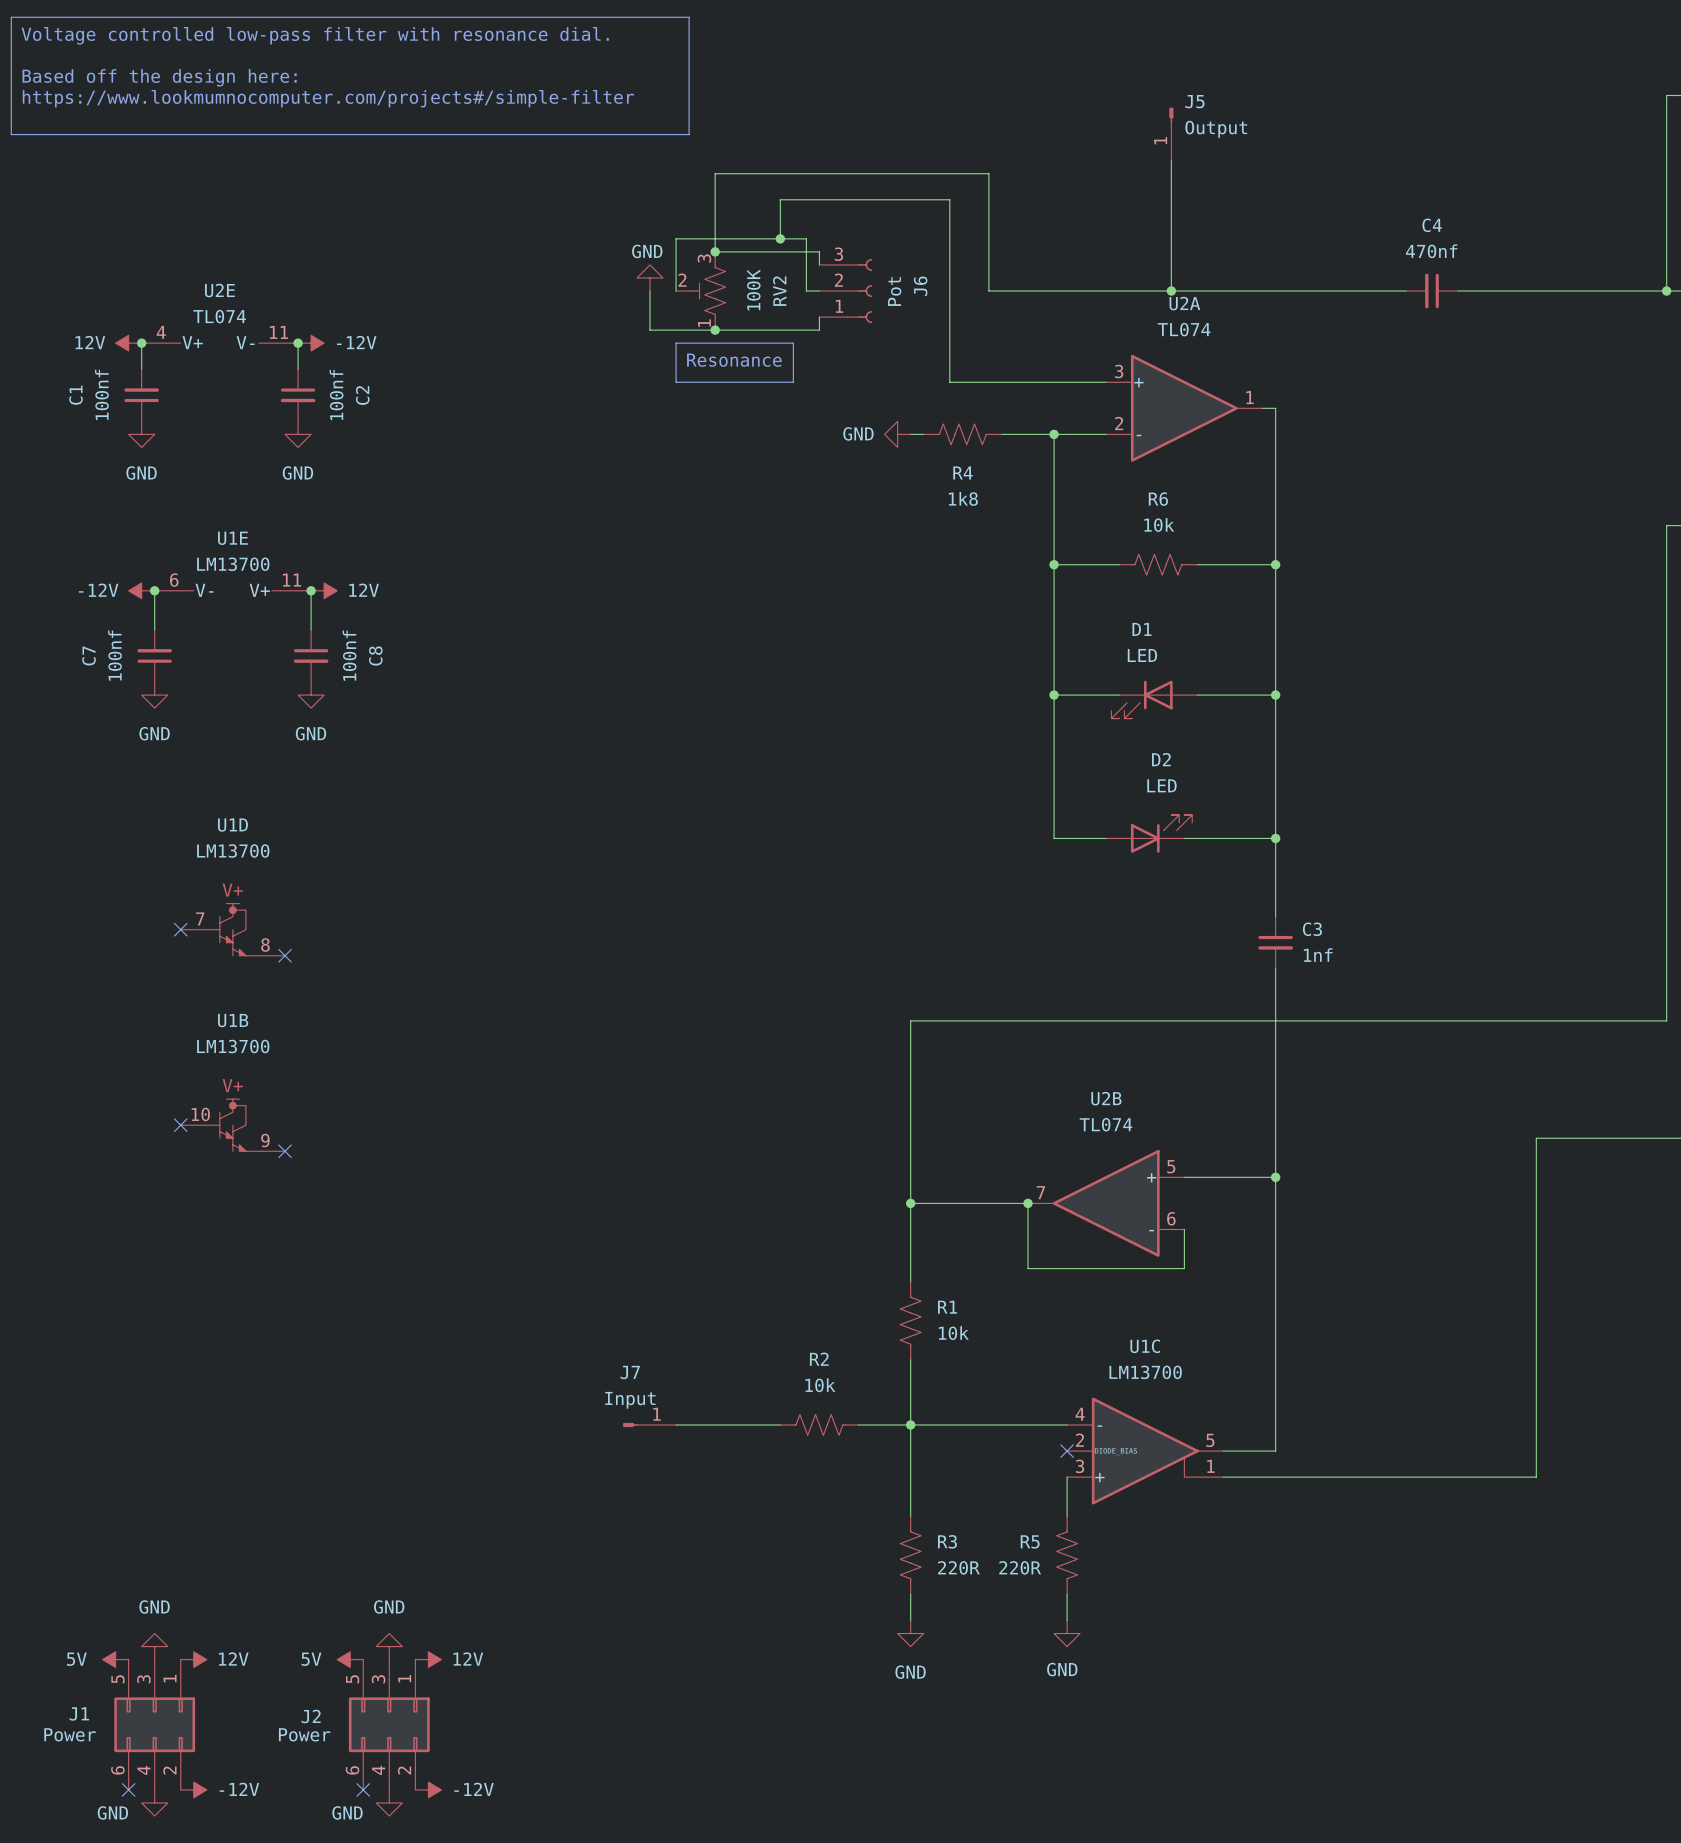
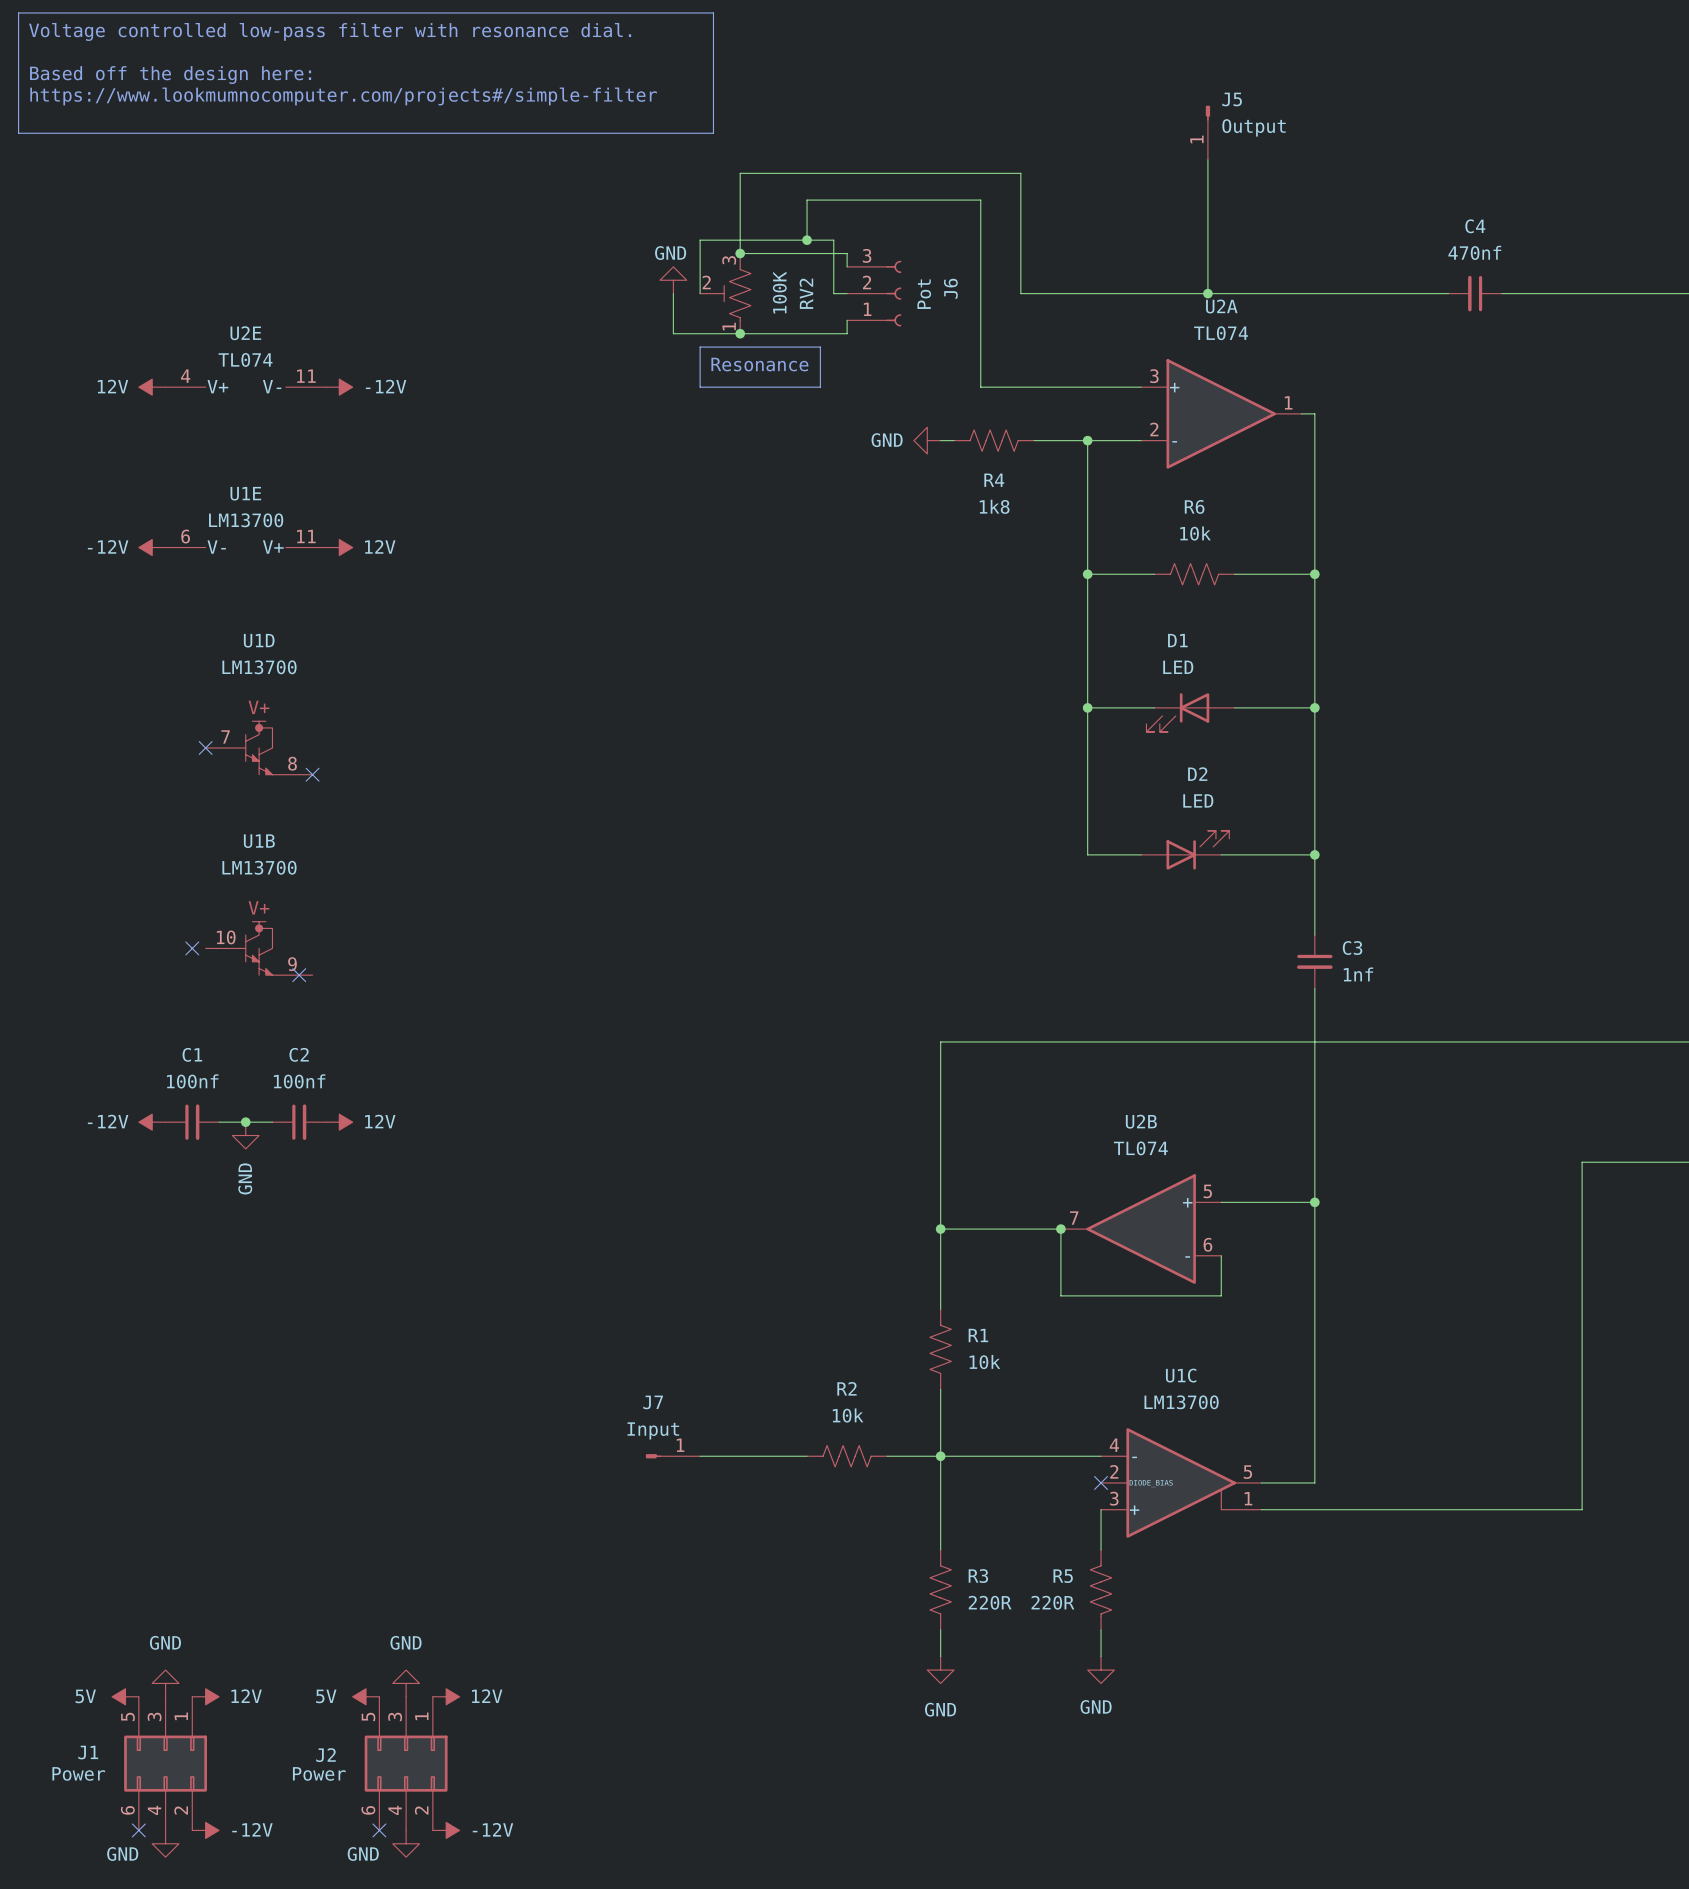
power symbol position: 12V (128, 343) -> 12V (152, 387)
wire: (141, 343) (141, 369) -> none
junction: (141, 343) -> none
U2E position: (219, 343) -> (245, 387)
wire: (298, 343) (298, 369) -> none
junction: (298, 343) -> none
power symbol position: -12V (311, 343) -> -12V (339, 387)
C1 rotation: 0° (141, 395) -> 90° clockwise (192, 1122)
C1 position: (141, 395) -> (192, 1122)
C2 rotation: 0° (298, 395) -> 90° counterclockwise (299, 1122)
C2 position: (298, 395) -> (299, 1122)
power symbol: GND (141, 434) -> none
power symbol: GND (298, 434) -> none
power symbol position: -12V (141, 590) -> -12V (152, 547)
wire: (154, 590) (154, 629) -> none
junction: (154, 590) -> none
U1E position: (232, 590) -> (245, 547)
wire: (311, 590) (311, 629) -> none
junction: (311, 590) -> none
power symbol position: 12V (324, 590) -> 12V (339, 547)
C7: 100nf (154, 655) -> none
C8: 100nf (311, 655) -> none
power symbol: GND (154, 695) -> none
power symbol: GND (311, 695) -> none
no-connect mark: none -> (205, 747)
no-connect mark: none -> (312, 774)
U1D position: (232, 929) -> (259, 747)
power symbol: none -> -12V (152, 1122)
wire: none -> (219, 1122) (272, 1122)
junction: none -> (245, 1122)
power symbol: none -> 12V (339, 1122)
power symbol: none -> GND (245, 1135)
no-connect mark: (180, 1125) -> none
U1B position: (232, 1125) -> (259, 948)
no-connect mark: (285, 1151) -> none

